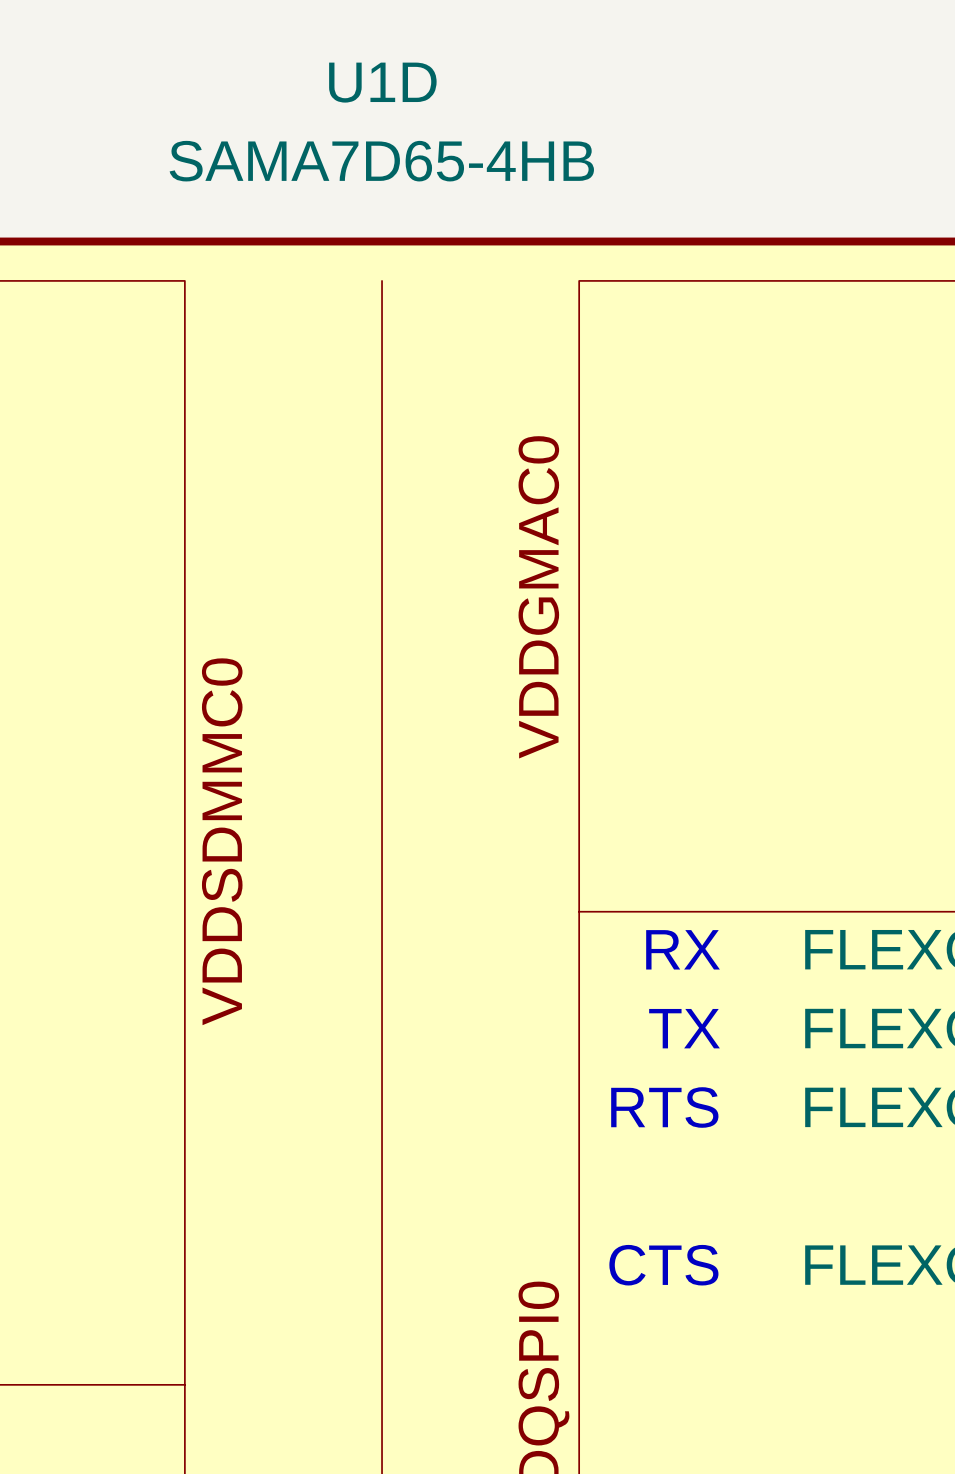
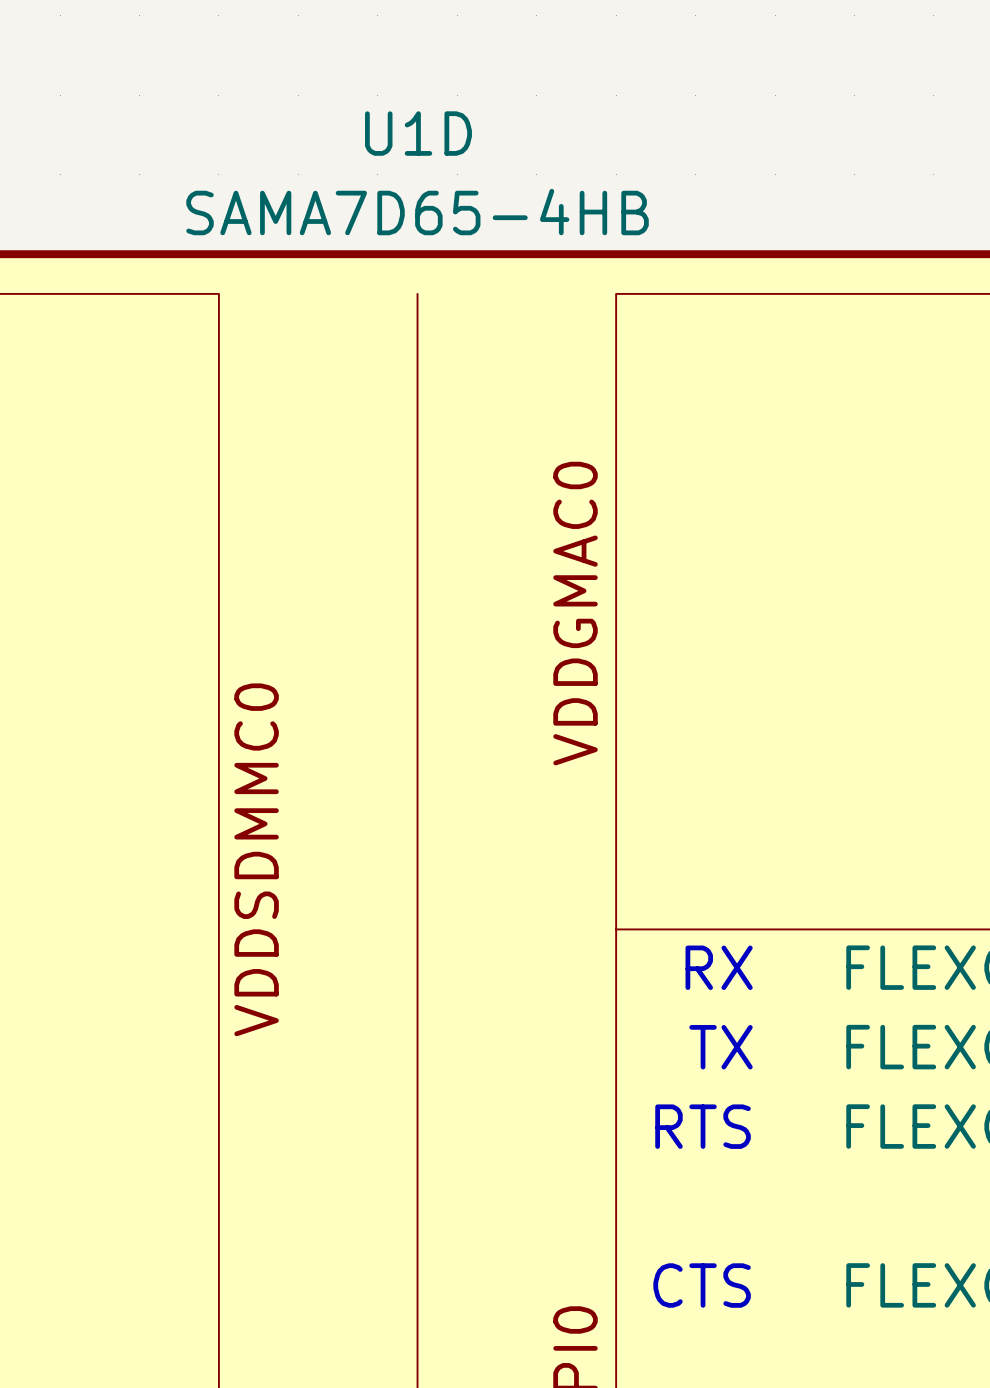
U1D name position: U1D (382, 82) -> U1D (418, 133)
U1D value position: SAMA7D65-4HB (381, 161) -> SAMA7D65-4HB (417, 212)

